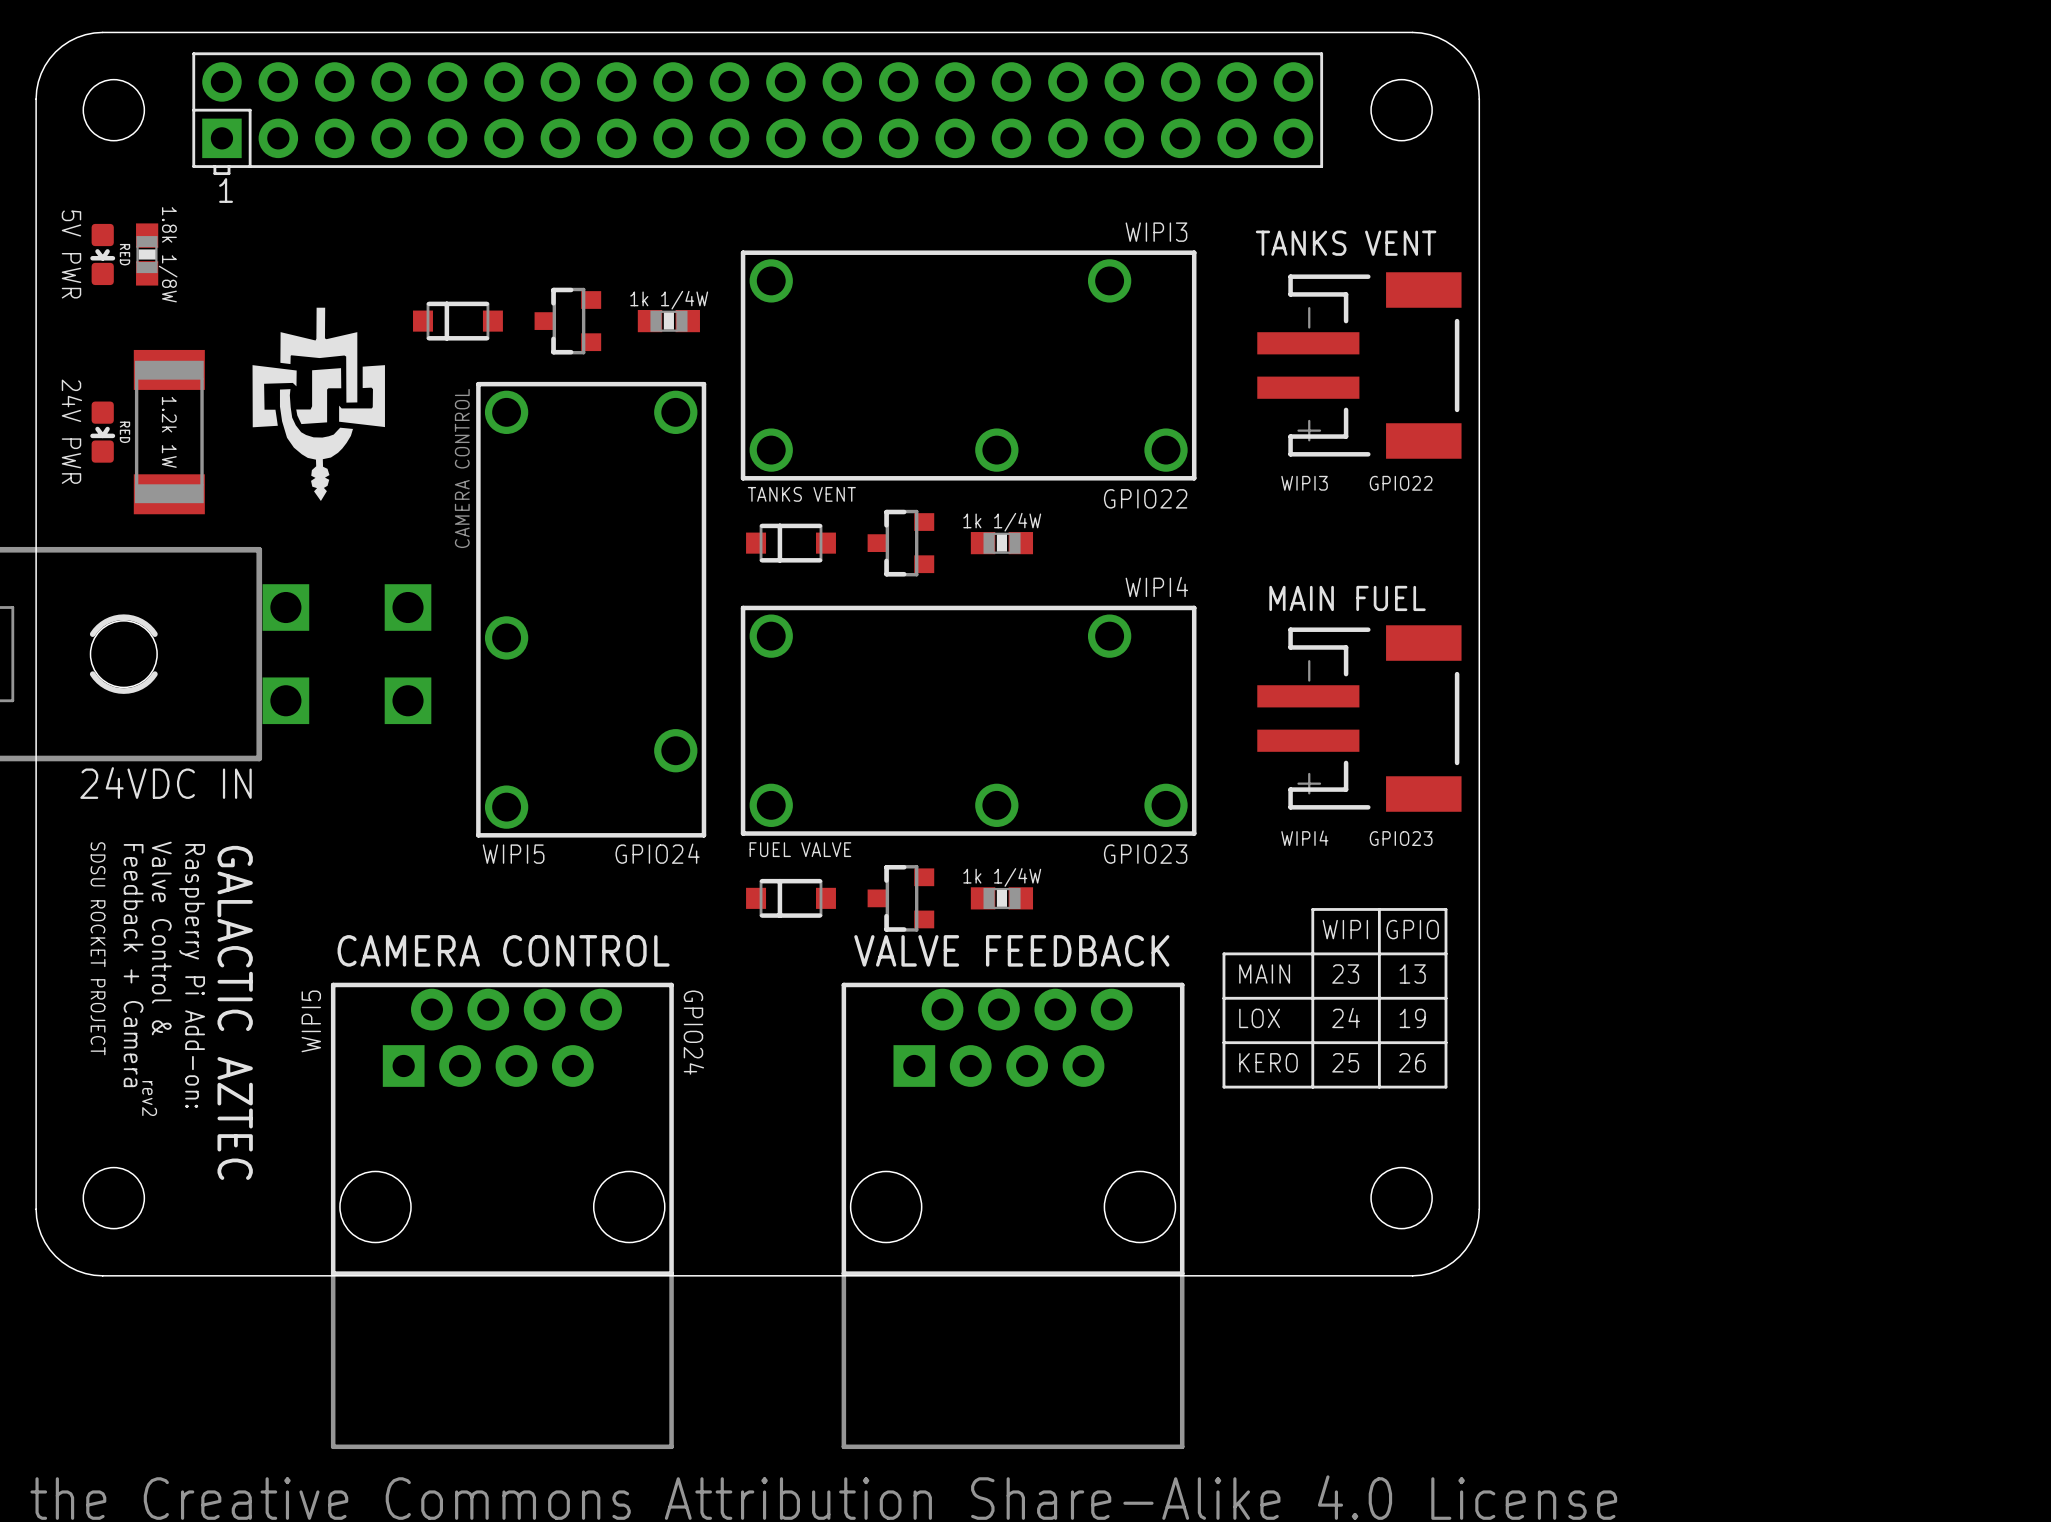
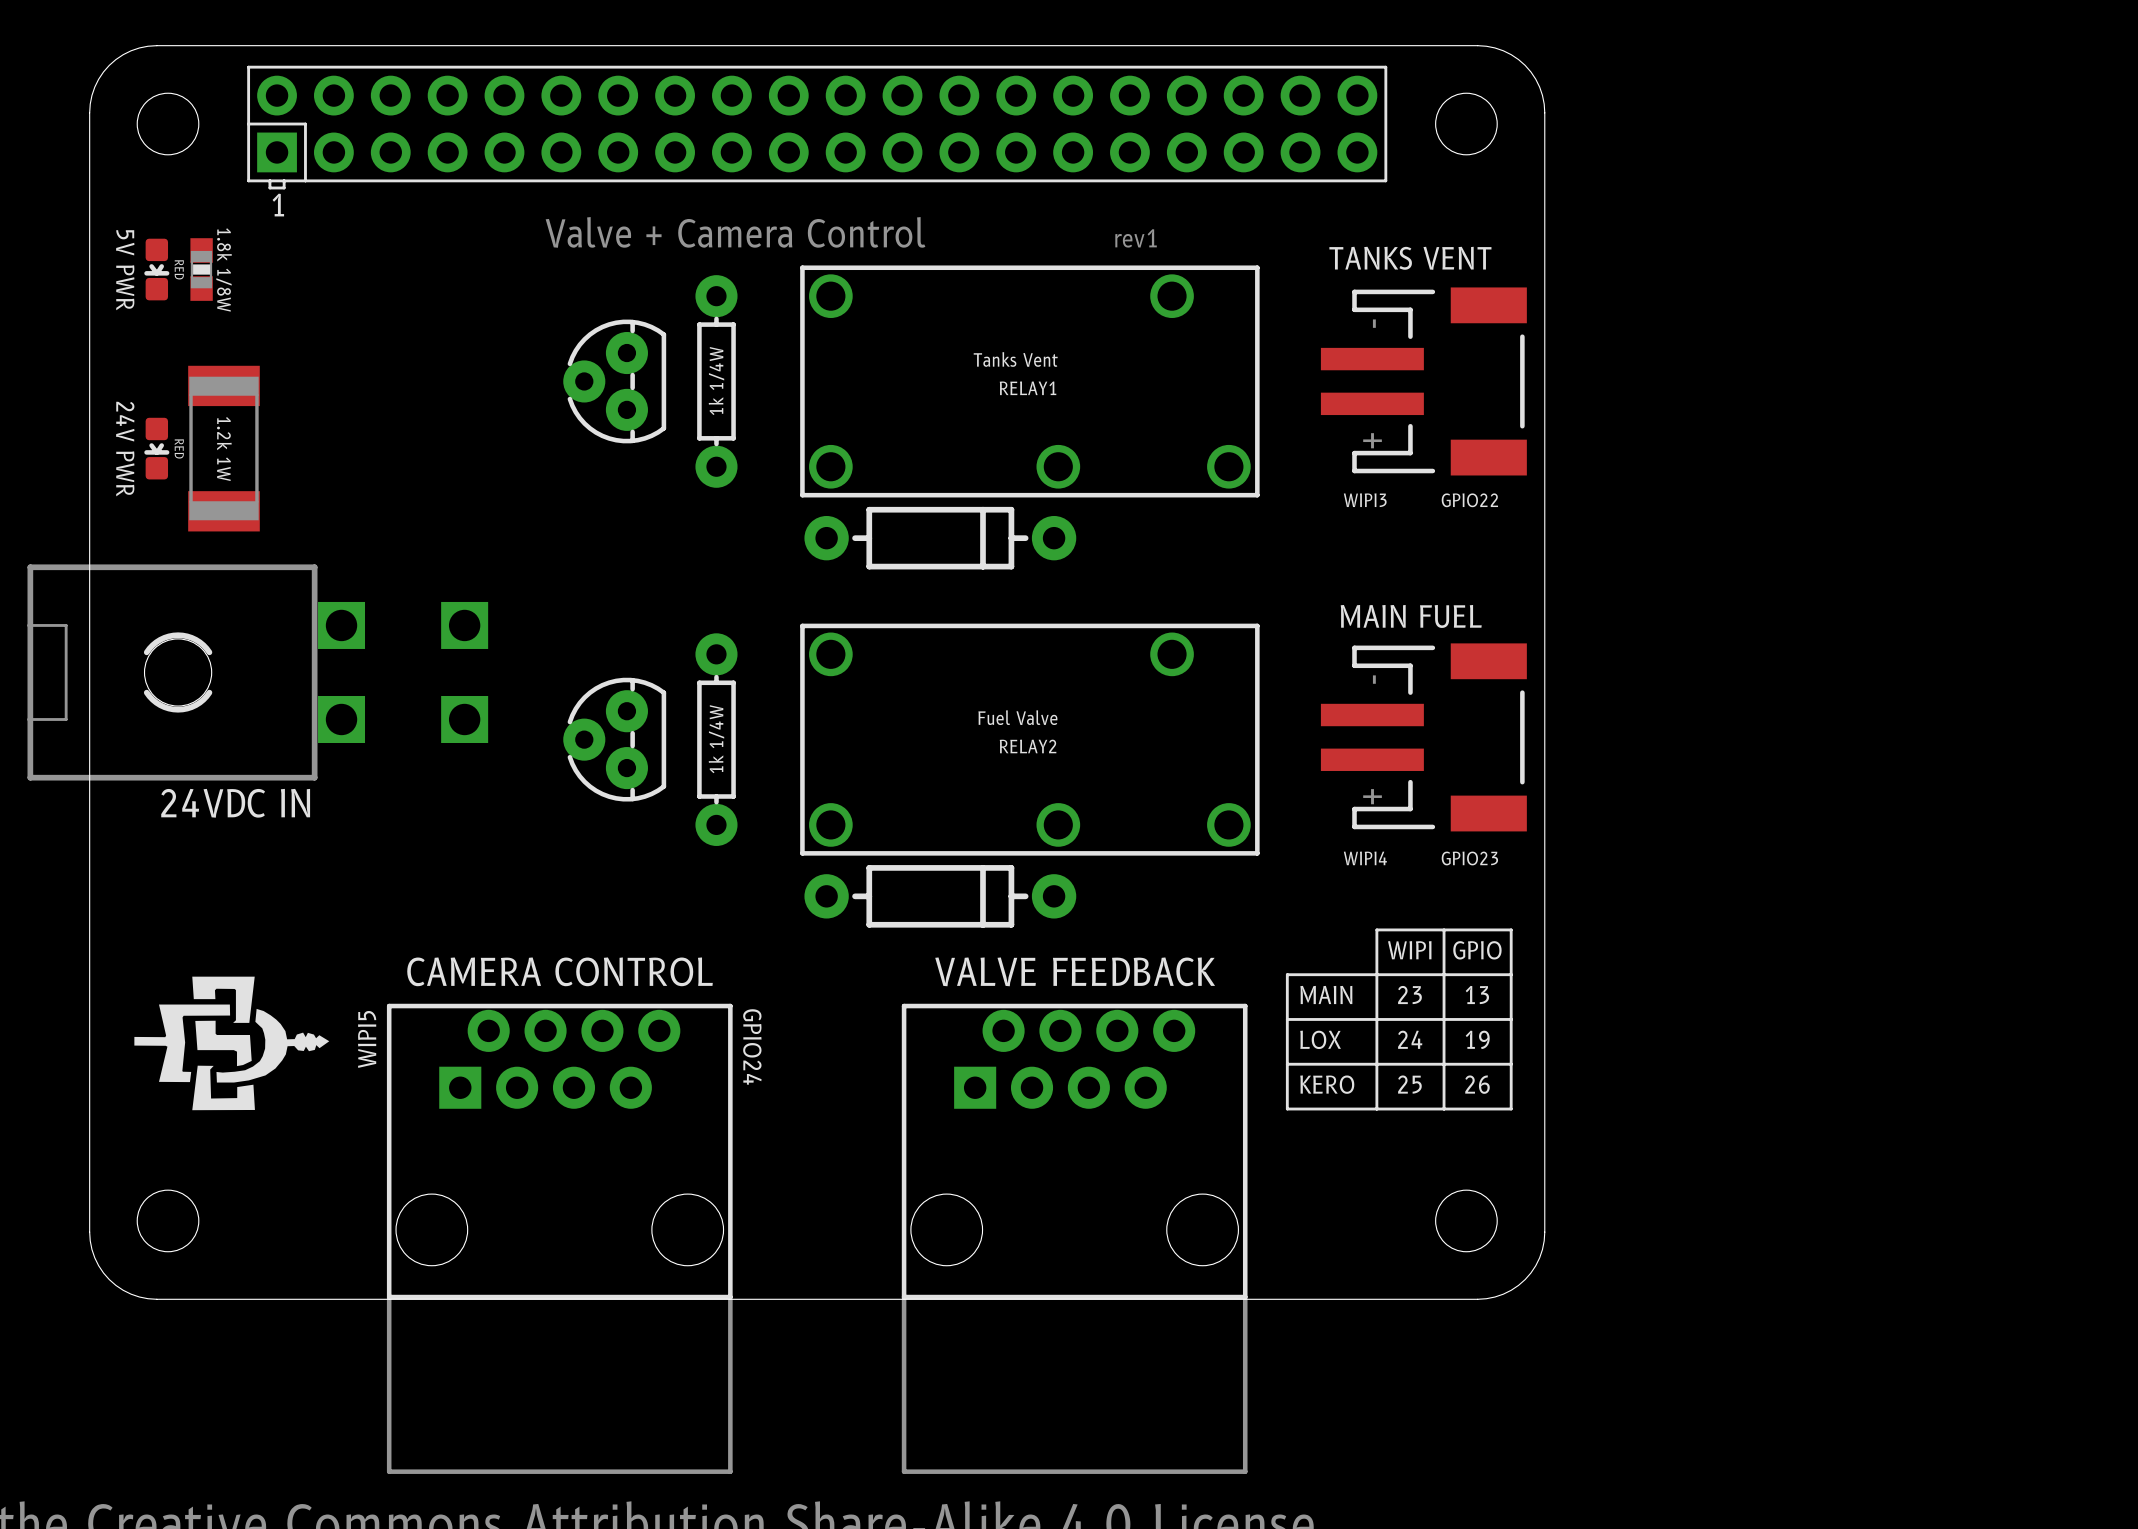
text: none -> Valve + Camera Control (735, 232)
text: none -> rev1 (1136, 238)
text: WIPI3 (1156, 232) -> none
drawing: [252, 307, 385, 502] -> none
part: (457, 321) -> none
part: (567, 321) -> none
part: 1k 1/4W (668, 321) -> none
part: none -> (614, 381)
part: none -> 1k 1/4W (716, 381)
RELAY1 name: none -> RELAY1 (1028, 388)
RELAY1 value: TANKS VENT (801, 494) -> Tanks Vent (1015, 359)
text: GPIO22 (1145, 498) -> none
part: none -> (940, 538)
part: (791, 543) -> none
part: (900, 543) -> none
part: 1k 1/4W (1001, 543) -> none
text: WIPI4 (1156, 586) -> none
part: CAMERA CONTROL (591, 609) -> none
part: none -> (614, 739)
part: none -> 1k 1/4W (716, 739)
RELAY2 name: none -> RELAY2 (1028, 746)
RELAY2 value: FUEL VALVE (800, 849) -> Fuel Valve (1017, 717)
text: GPIO24 (657, 853) -> none
text: WIPI5 (513, 854) -> none
text: GPIO23 (1145, 854) -> none
part: none -> (940, 896)
part: (791, 898) -> none
part: (900, 898) -> none
part: 1k 1/4W (1001, 898) -> none
text: Valve Control & (161, 938) -> none
text: SDSU ROCKET PROJECT (98, 948) -> none
drawing: none -> [134, 976, 330, 1111]
text: Feedback + Camera (133, 965) -> none
text: Raspberry Pi Add-on: (192, 976) -> none
text: GALACTIC AZTEC (235, 1012) -> none
text: rev2 (149, 1098) -> none

